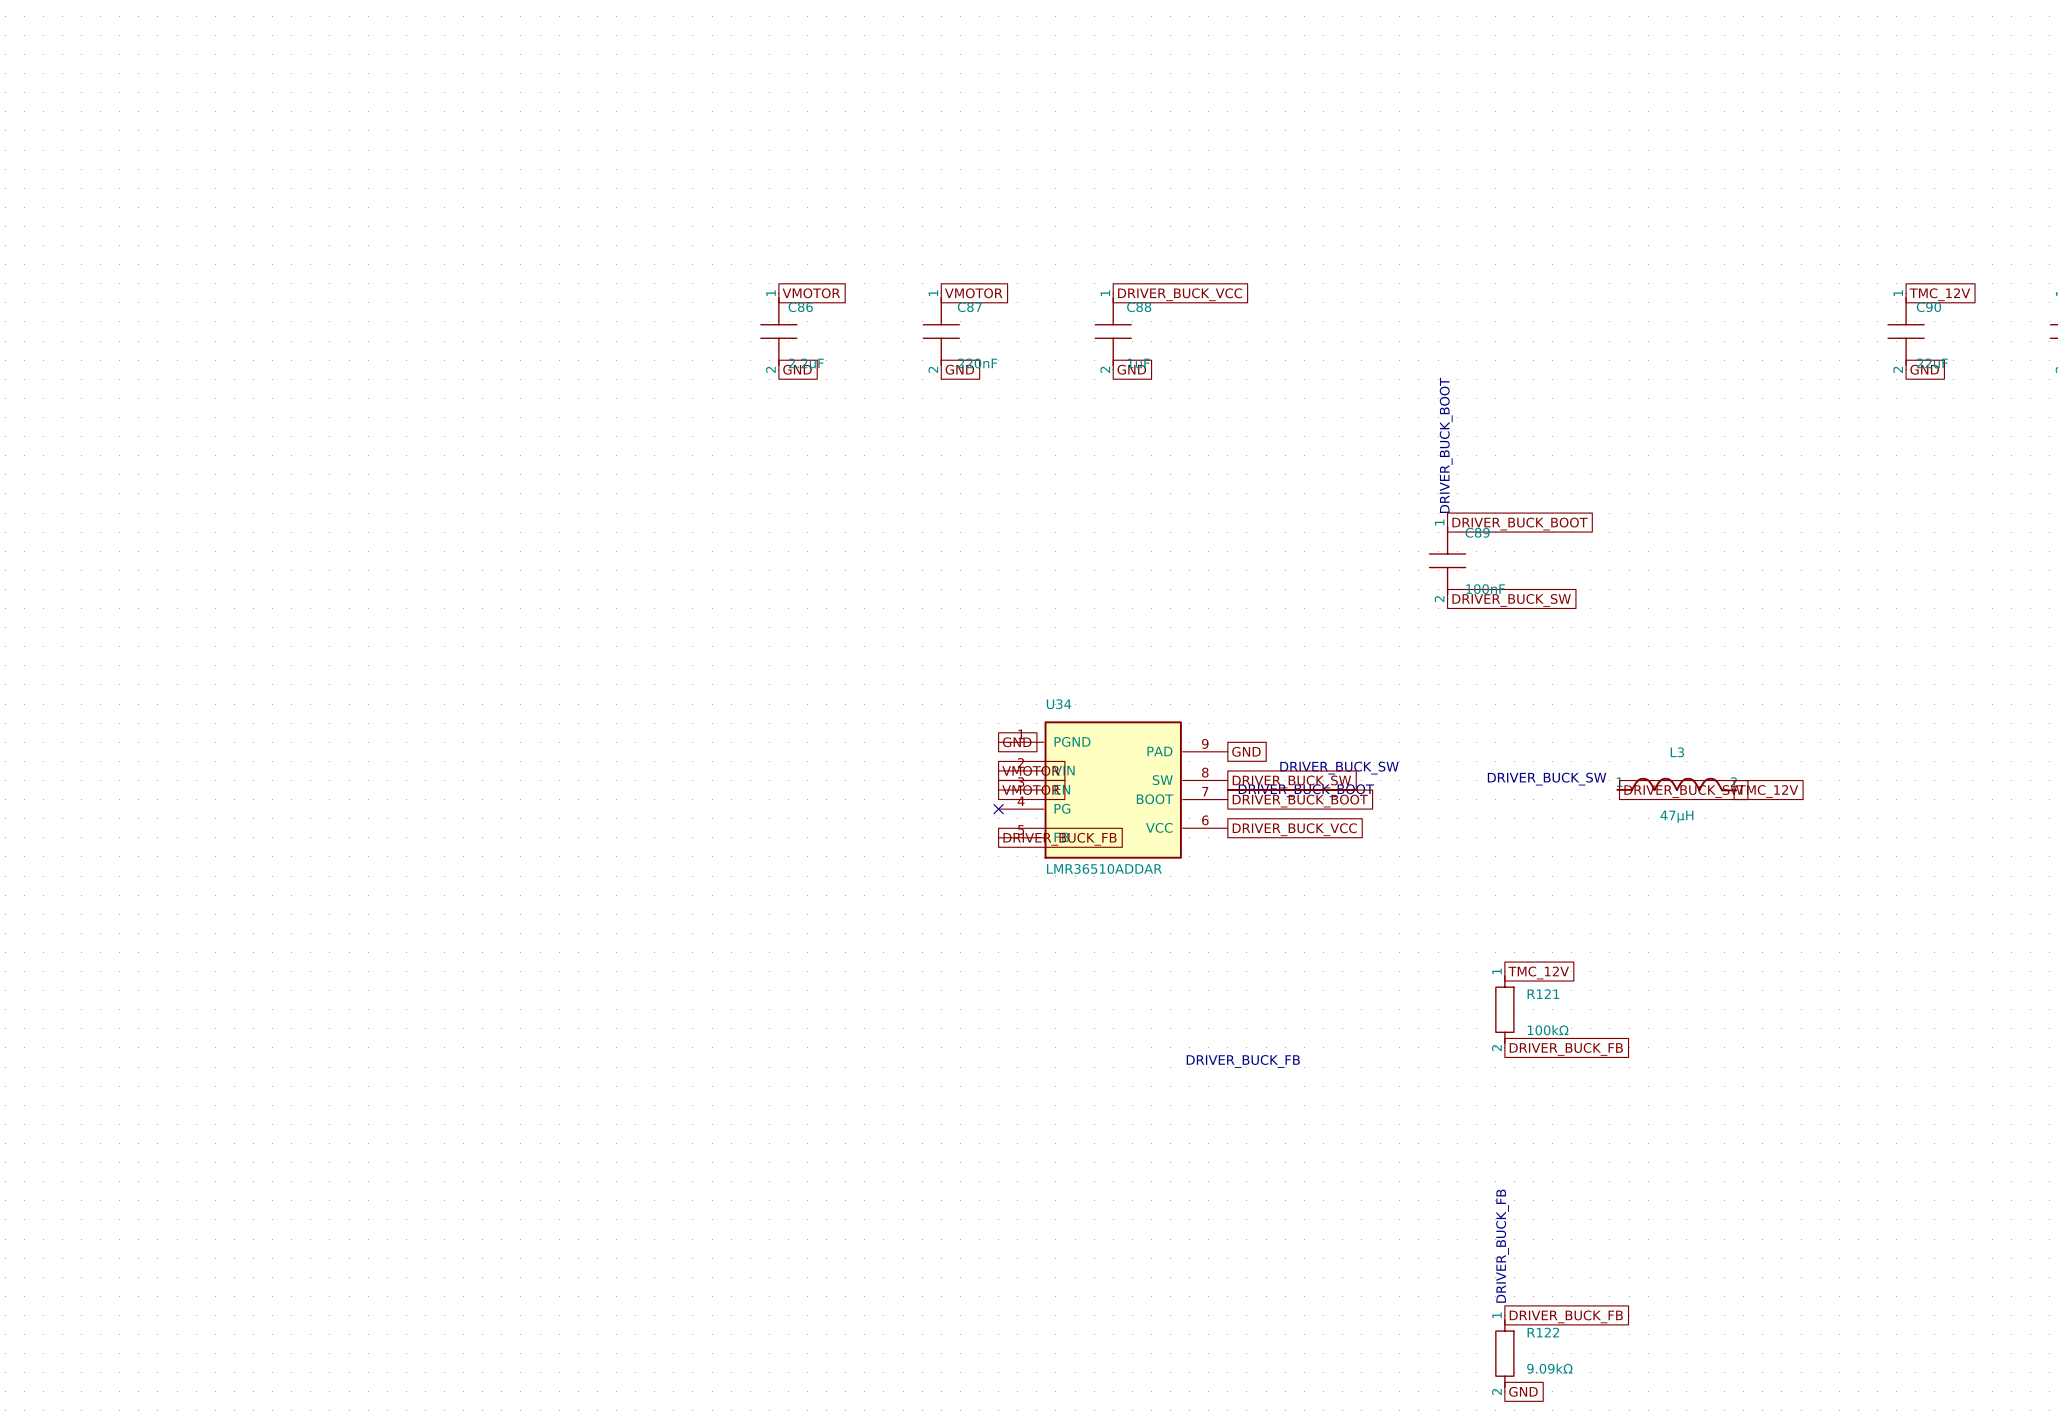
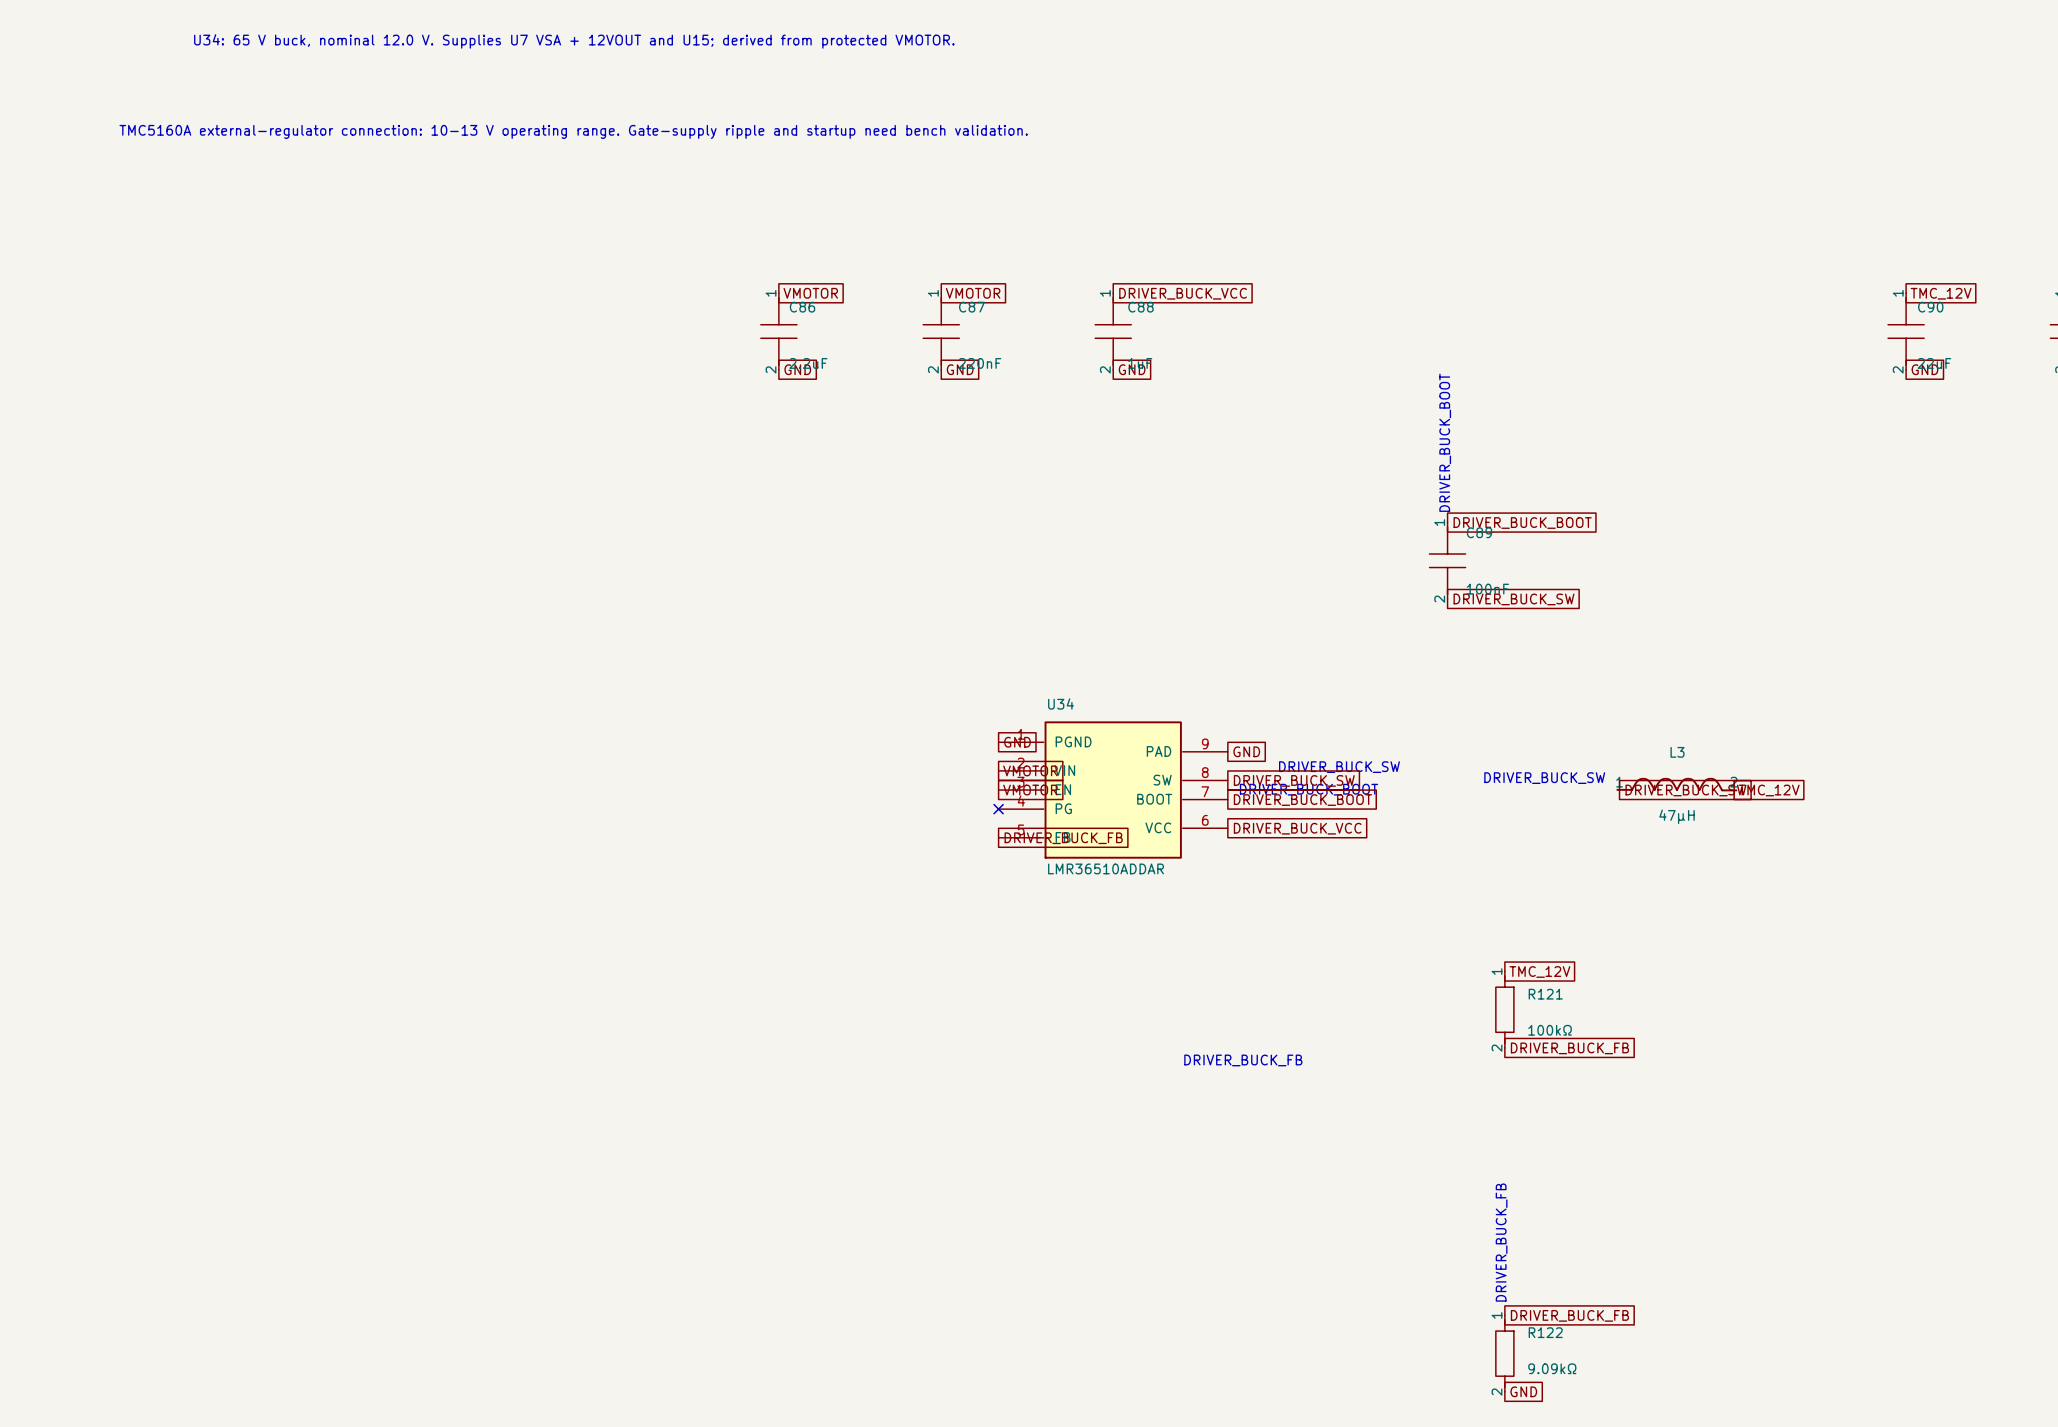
text: none -> U34: 65 V buck, nominal 12.0 V. Supplies U7 VSA + 12VOUT and U15; derived from protected VMOTOR. (574, 41)
text: none -> TMC5160A external-regulator connection: 10-13 V operating range. Gate-supply ripple and startup need bench validation. (573, 131)

